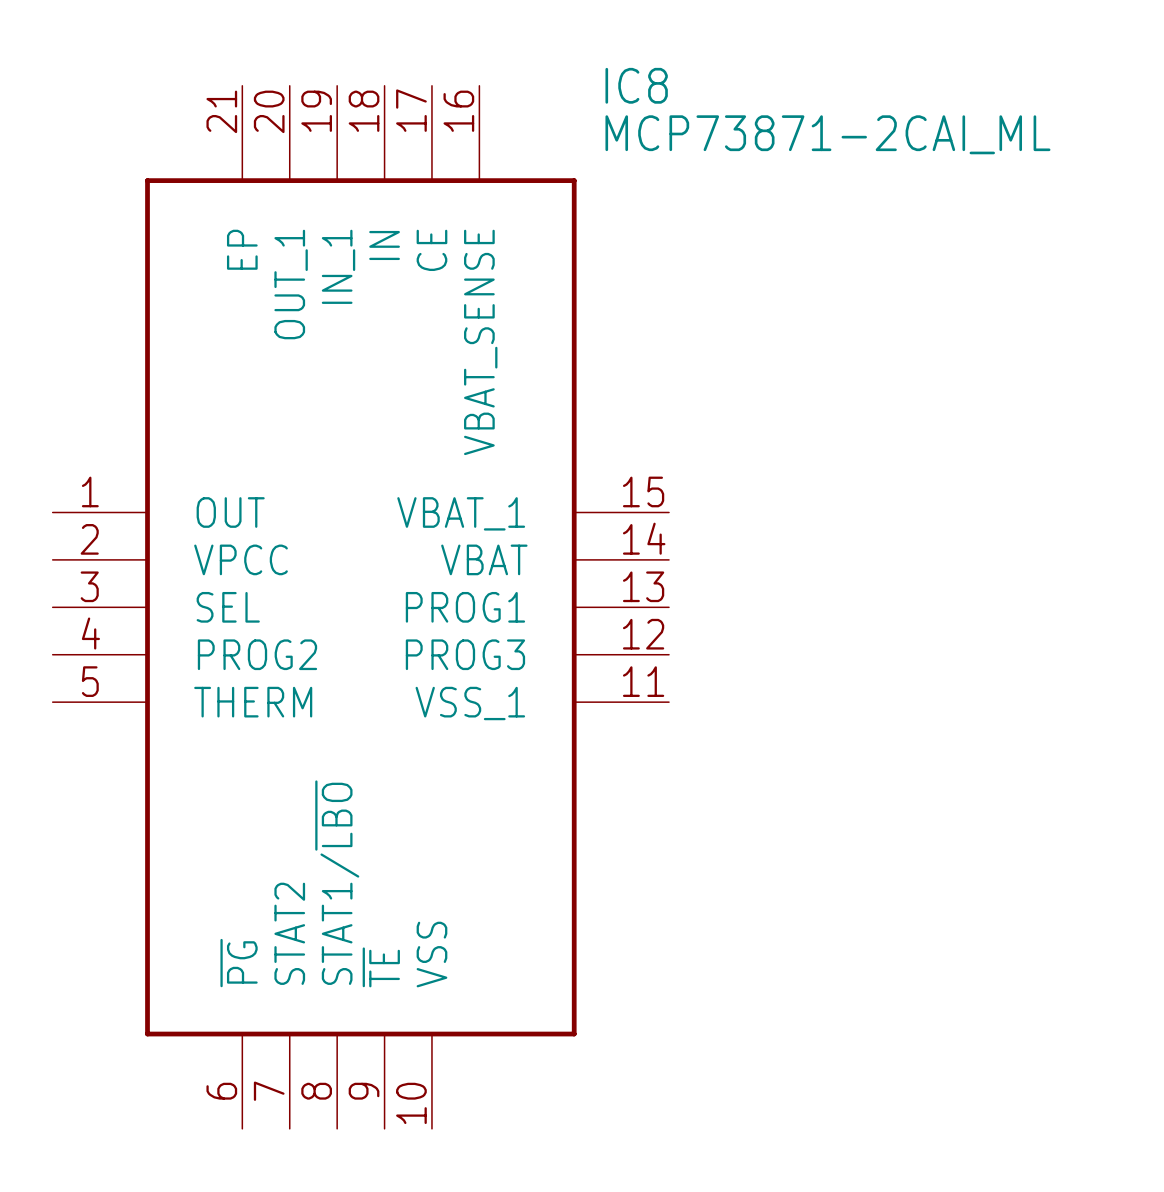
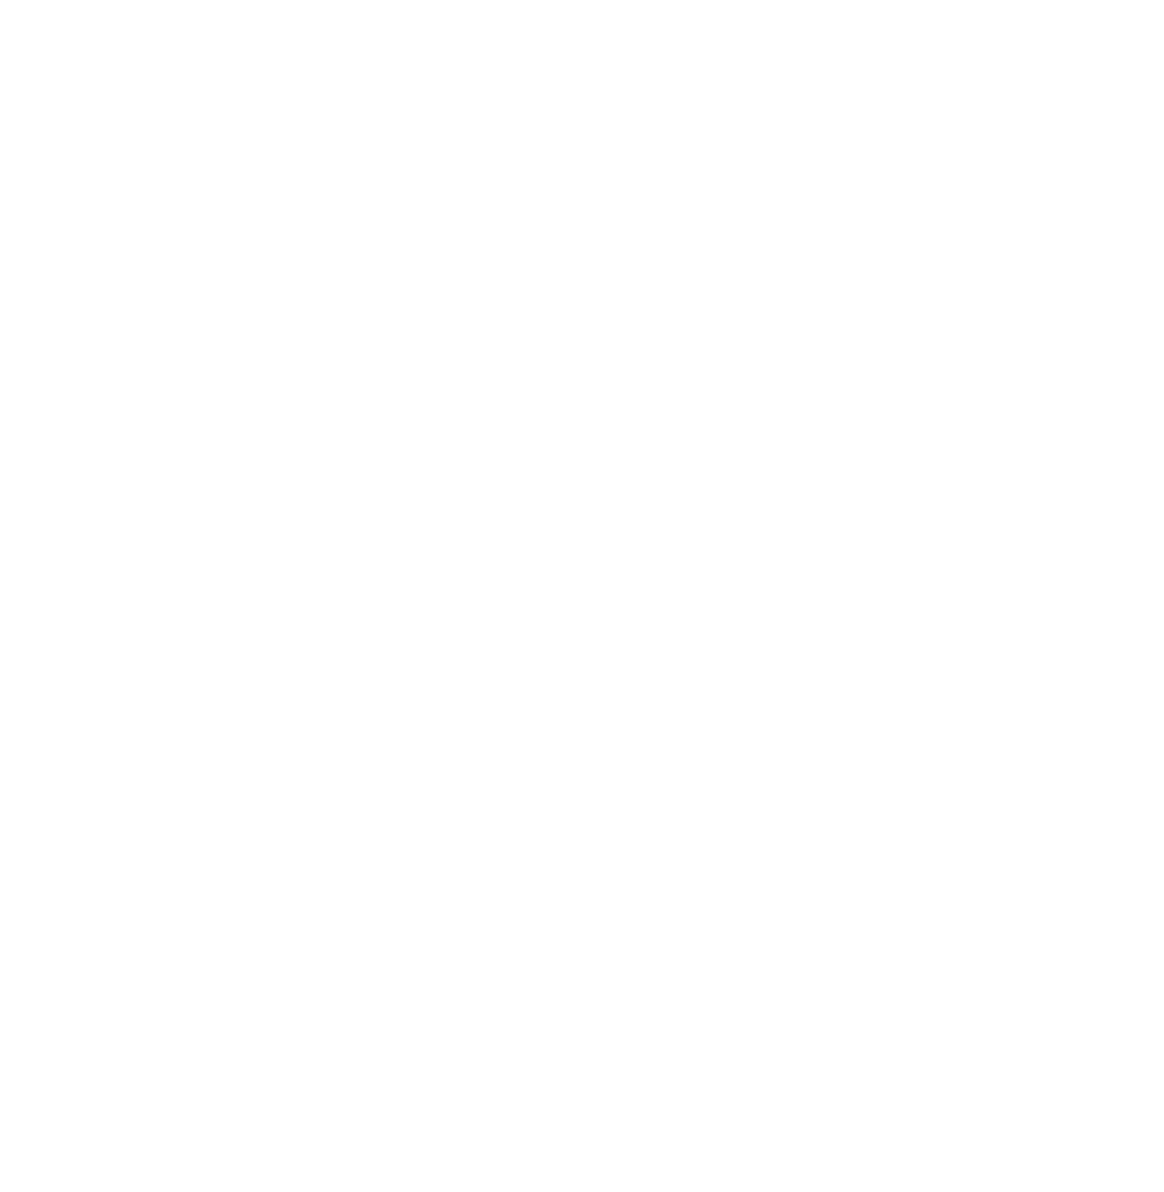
IC8: MCP73871-2CAI_ML (360, 607) -> none

